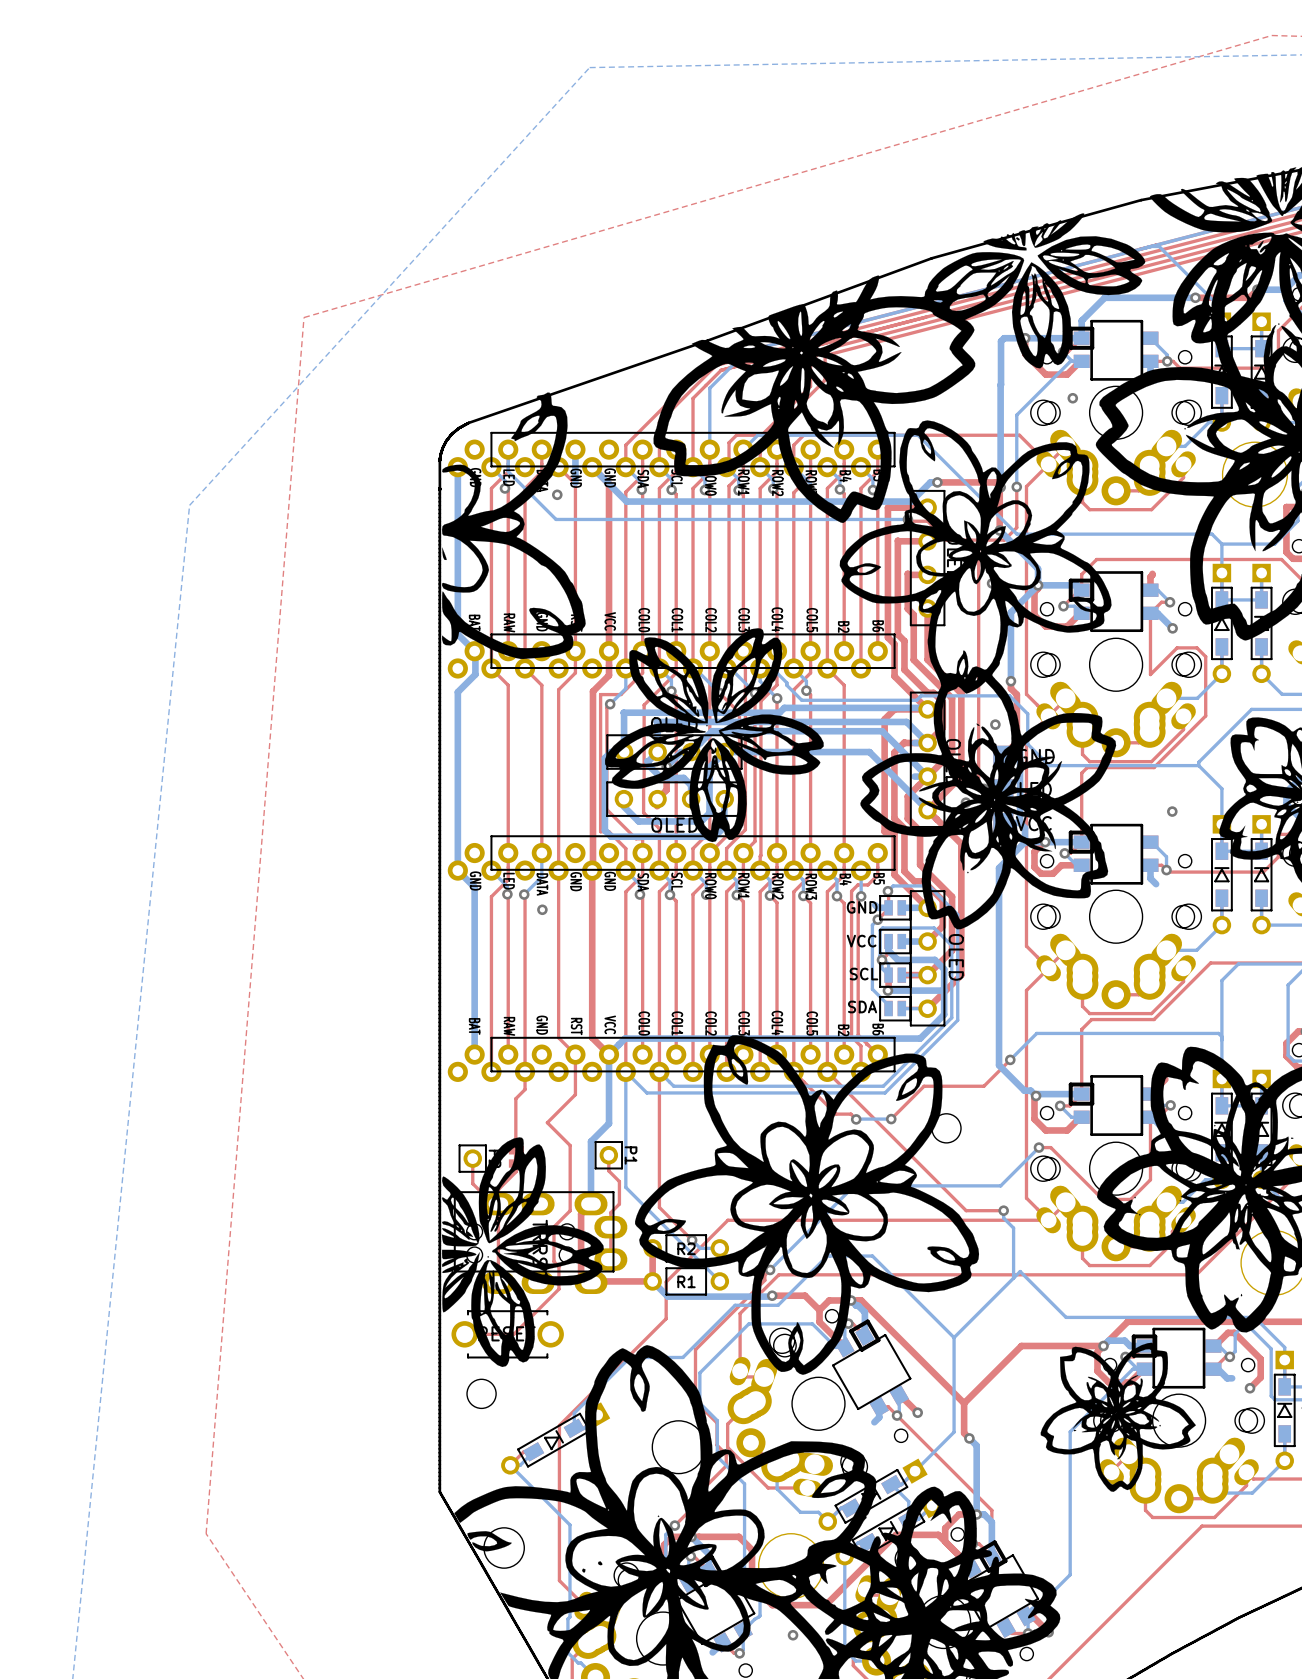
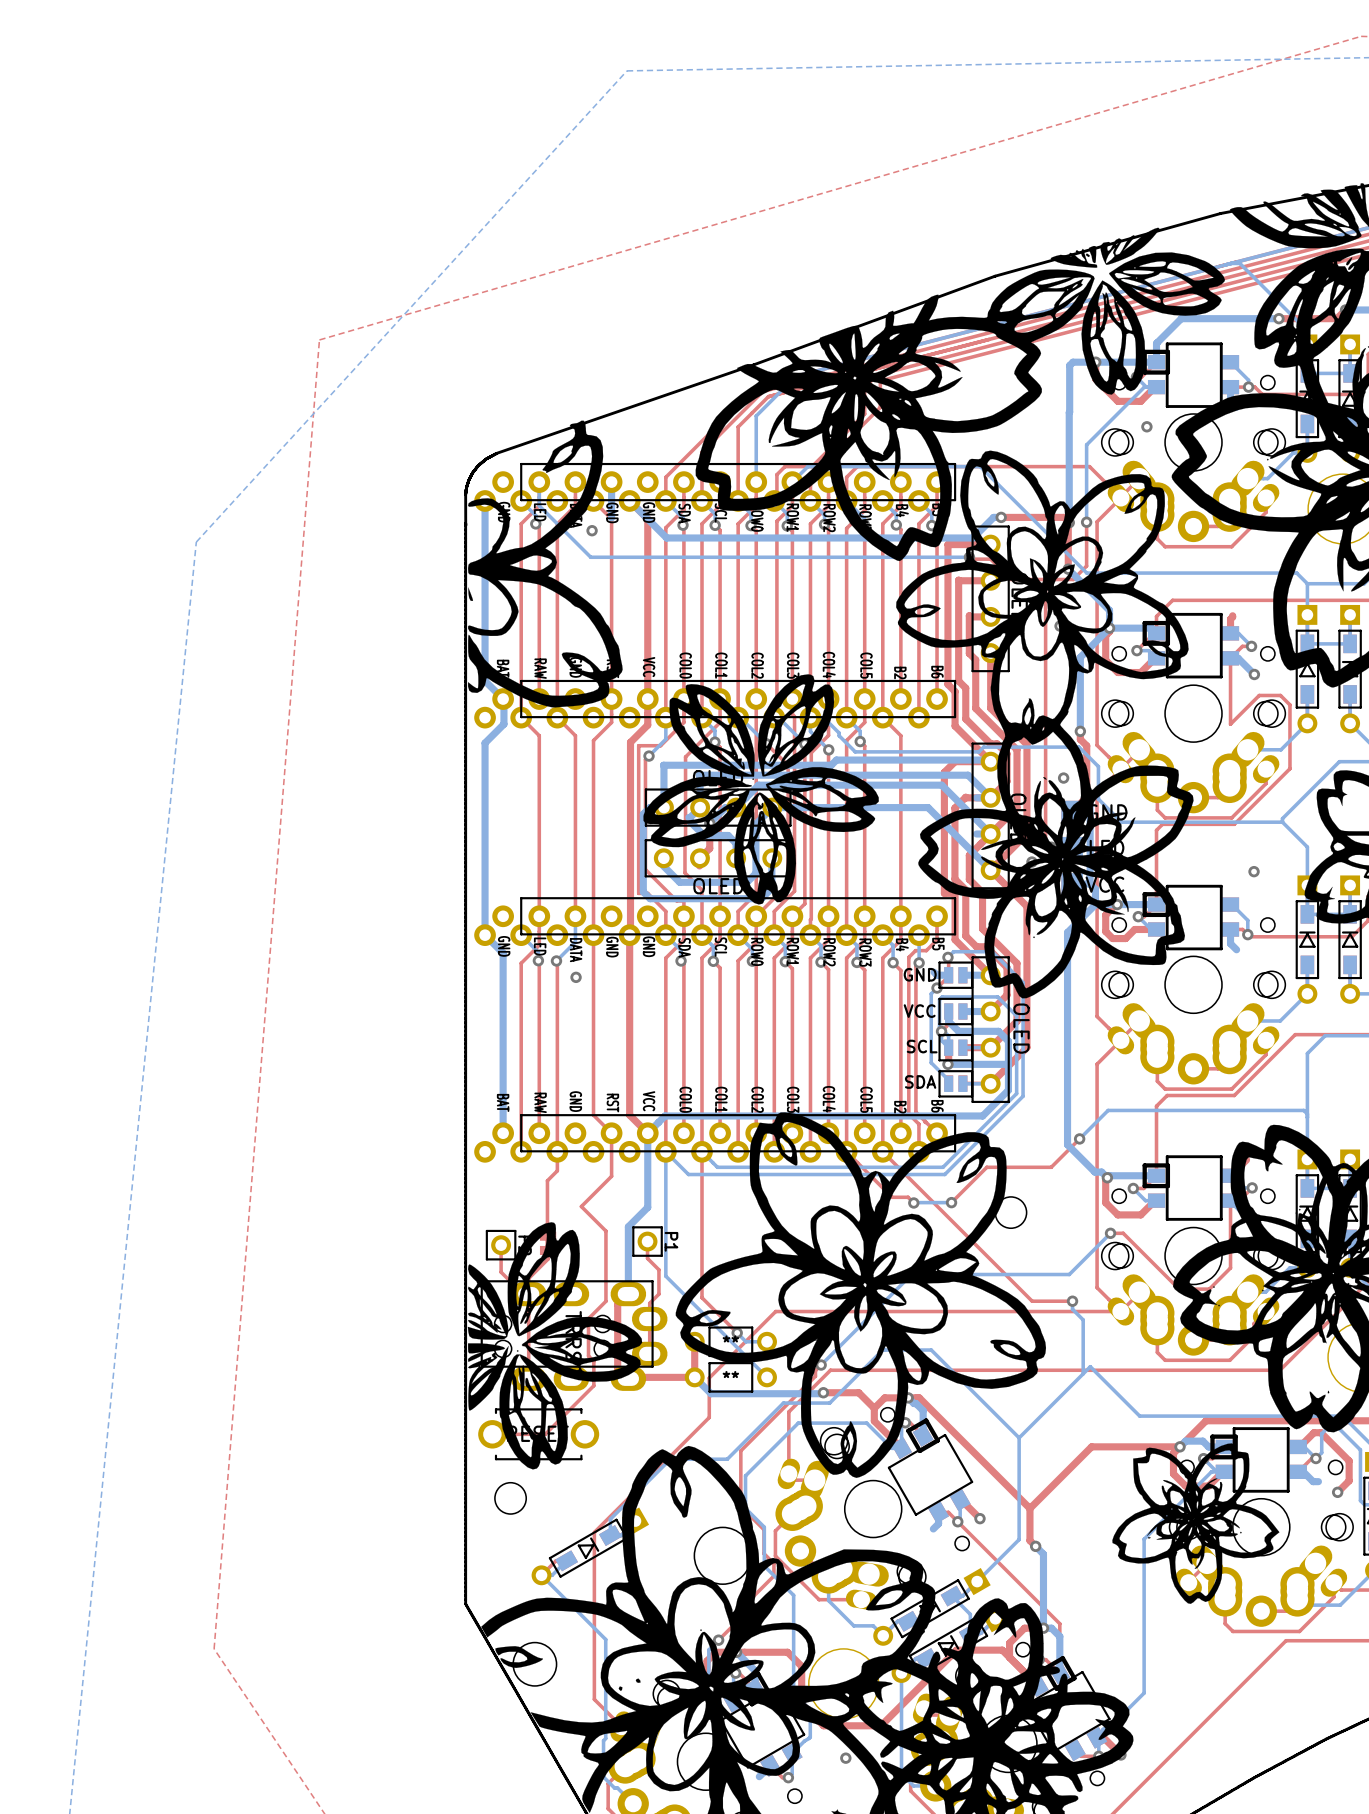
part text: R2 (686, 1248) -> ** (730, 1338)
part text: R1 (686, 1281) -> ** (730, 1374)

